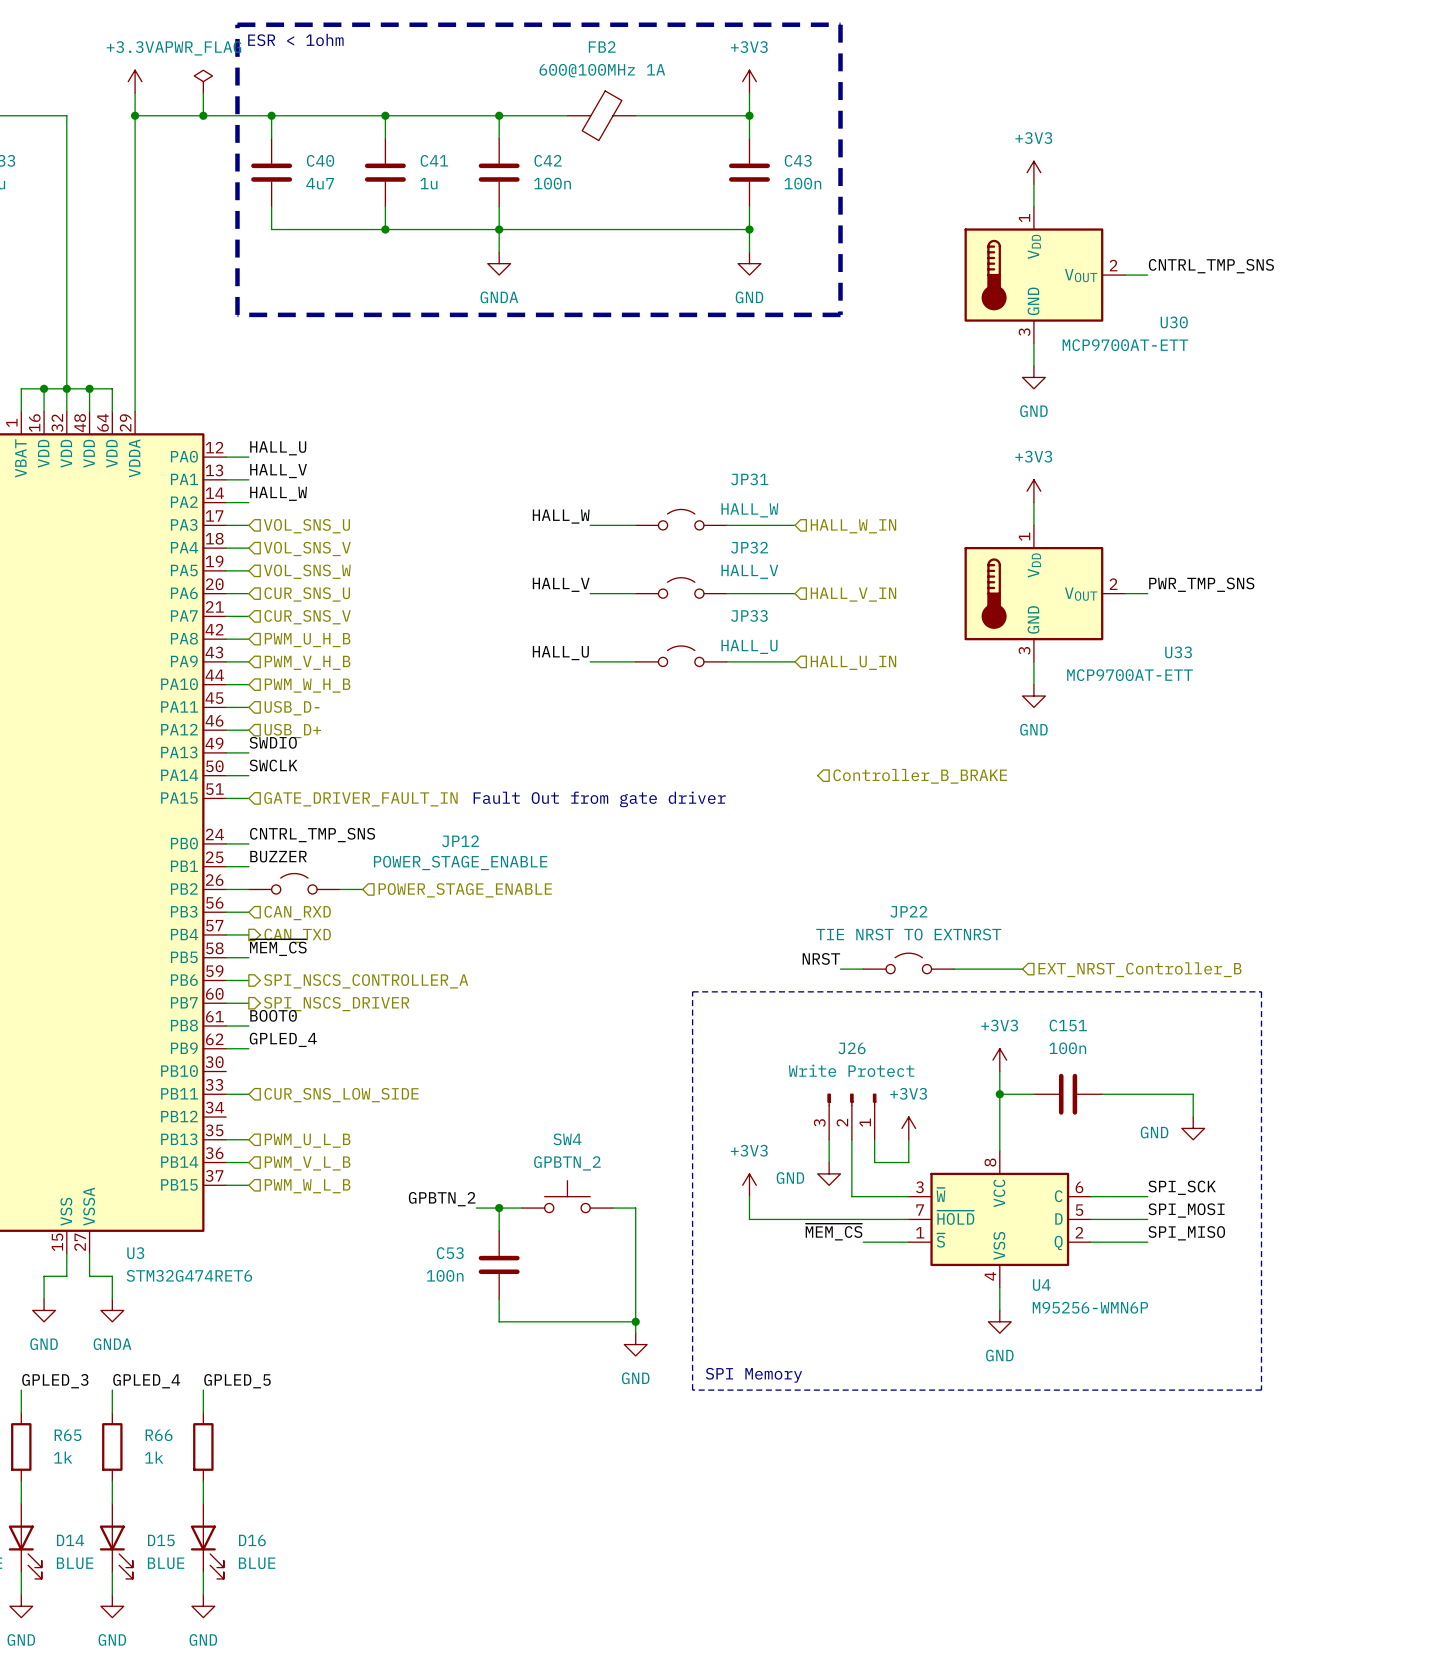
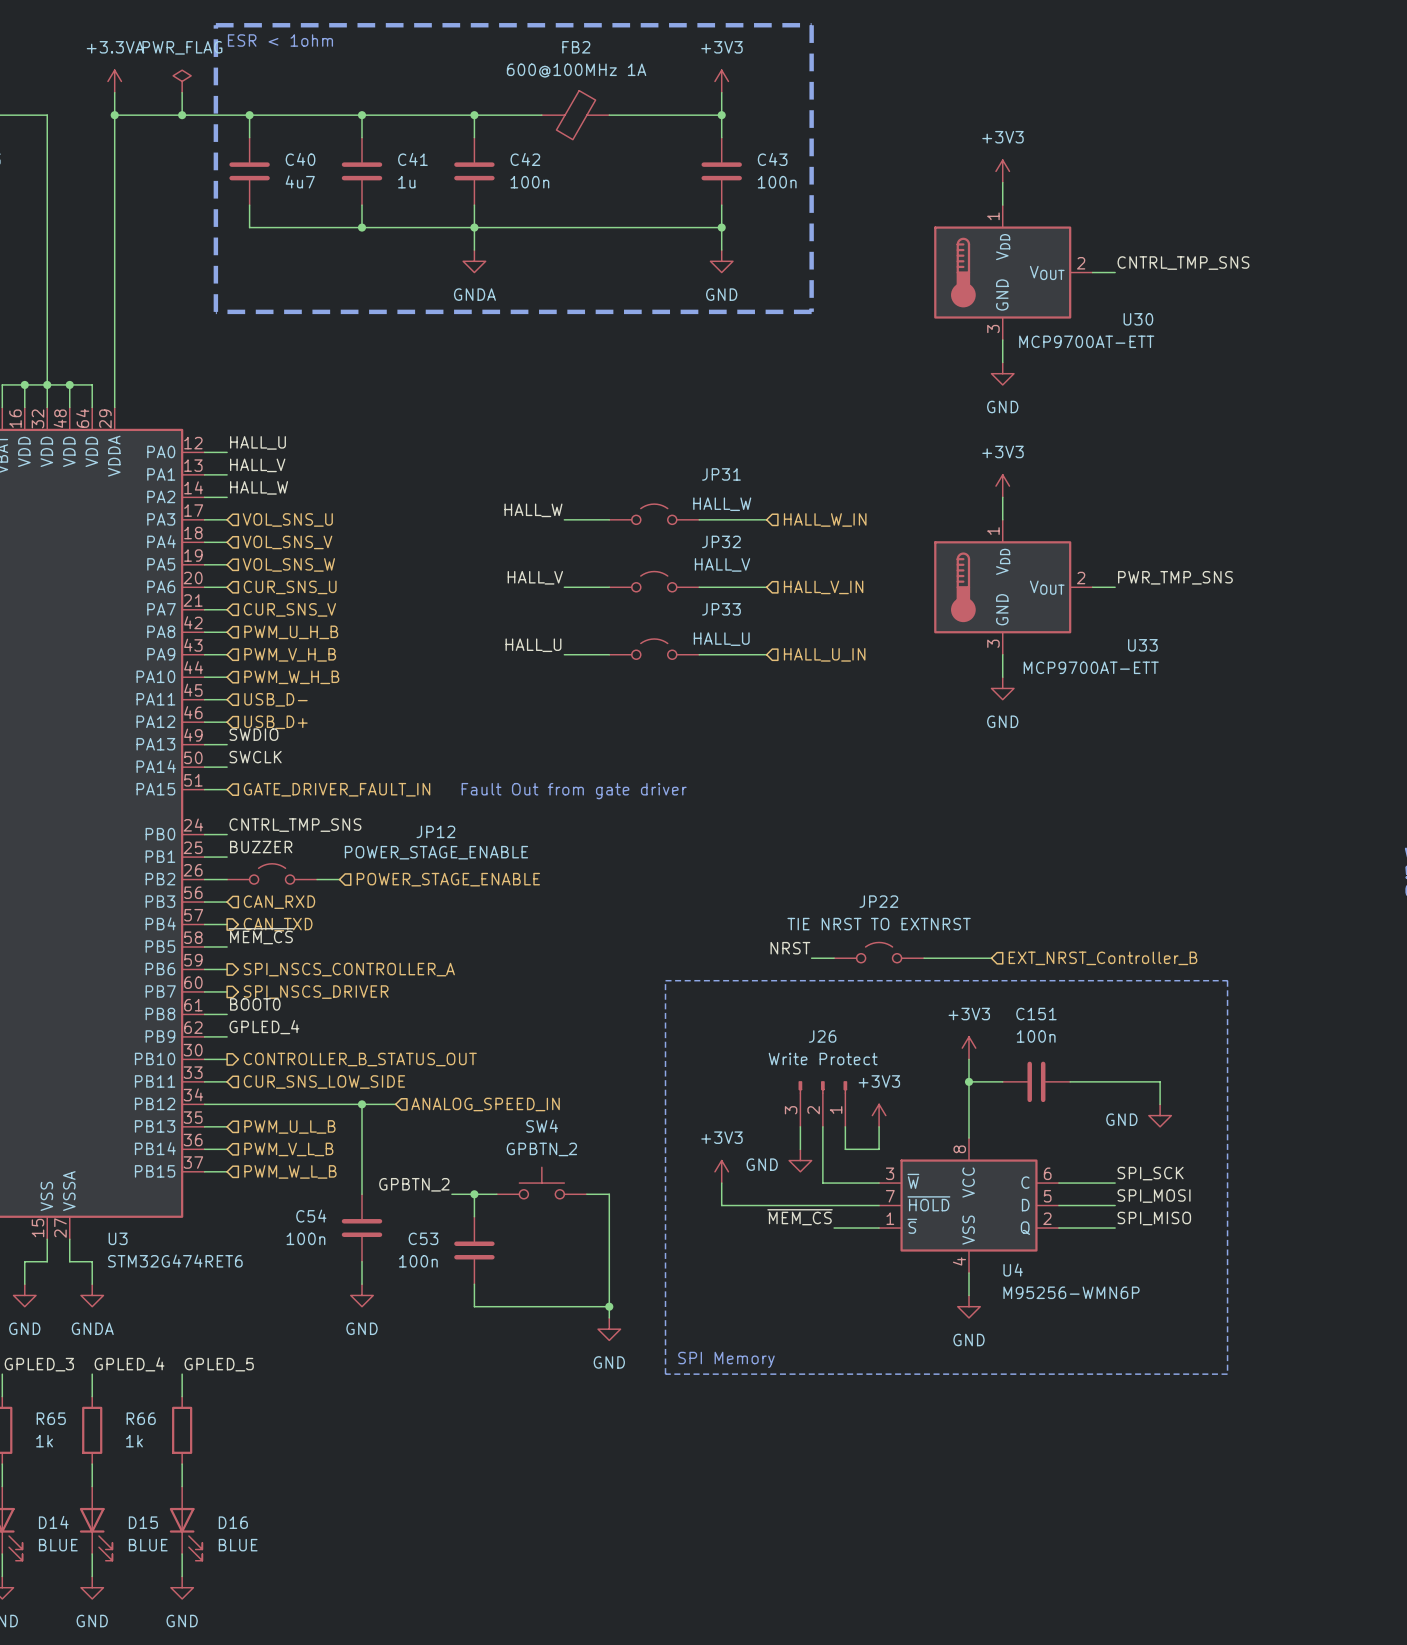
hierarchical label: Controller_B_BRAKE (920, 776) -> none
wire: none -> (204, 1059) (227, 1059)
hierarchical label: none -> CONTROLLER_B_STATUS_OUT (360, 1059)
wire: none -> (204, 1104) (395, 1104)
wire: none -> (362, 1104) (362, 1194)
junction: none -> (362, 1104)
hierarchical label: none -> ANALOG_SPEED_IN (485, 1104)
C54: none -> 100n (362, 1228)
wire: none -> (362, 1261) (362, 1284)
power symbol: none -> GND (362, 1295)

